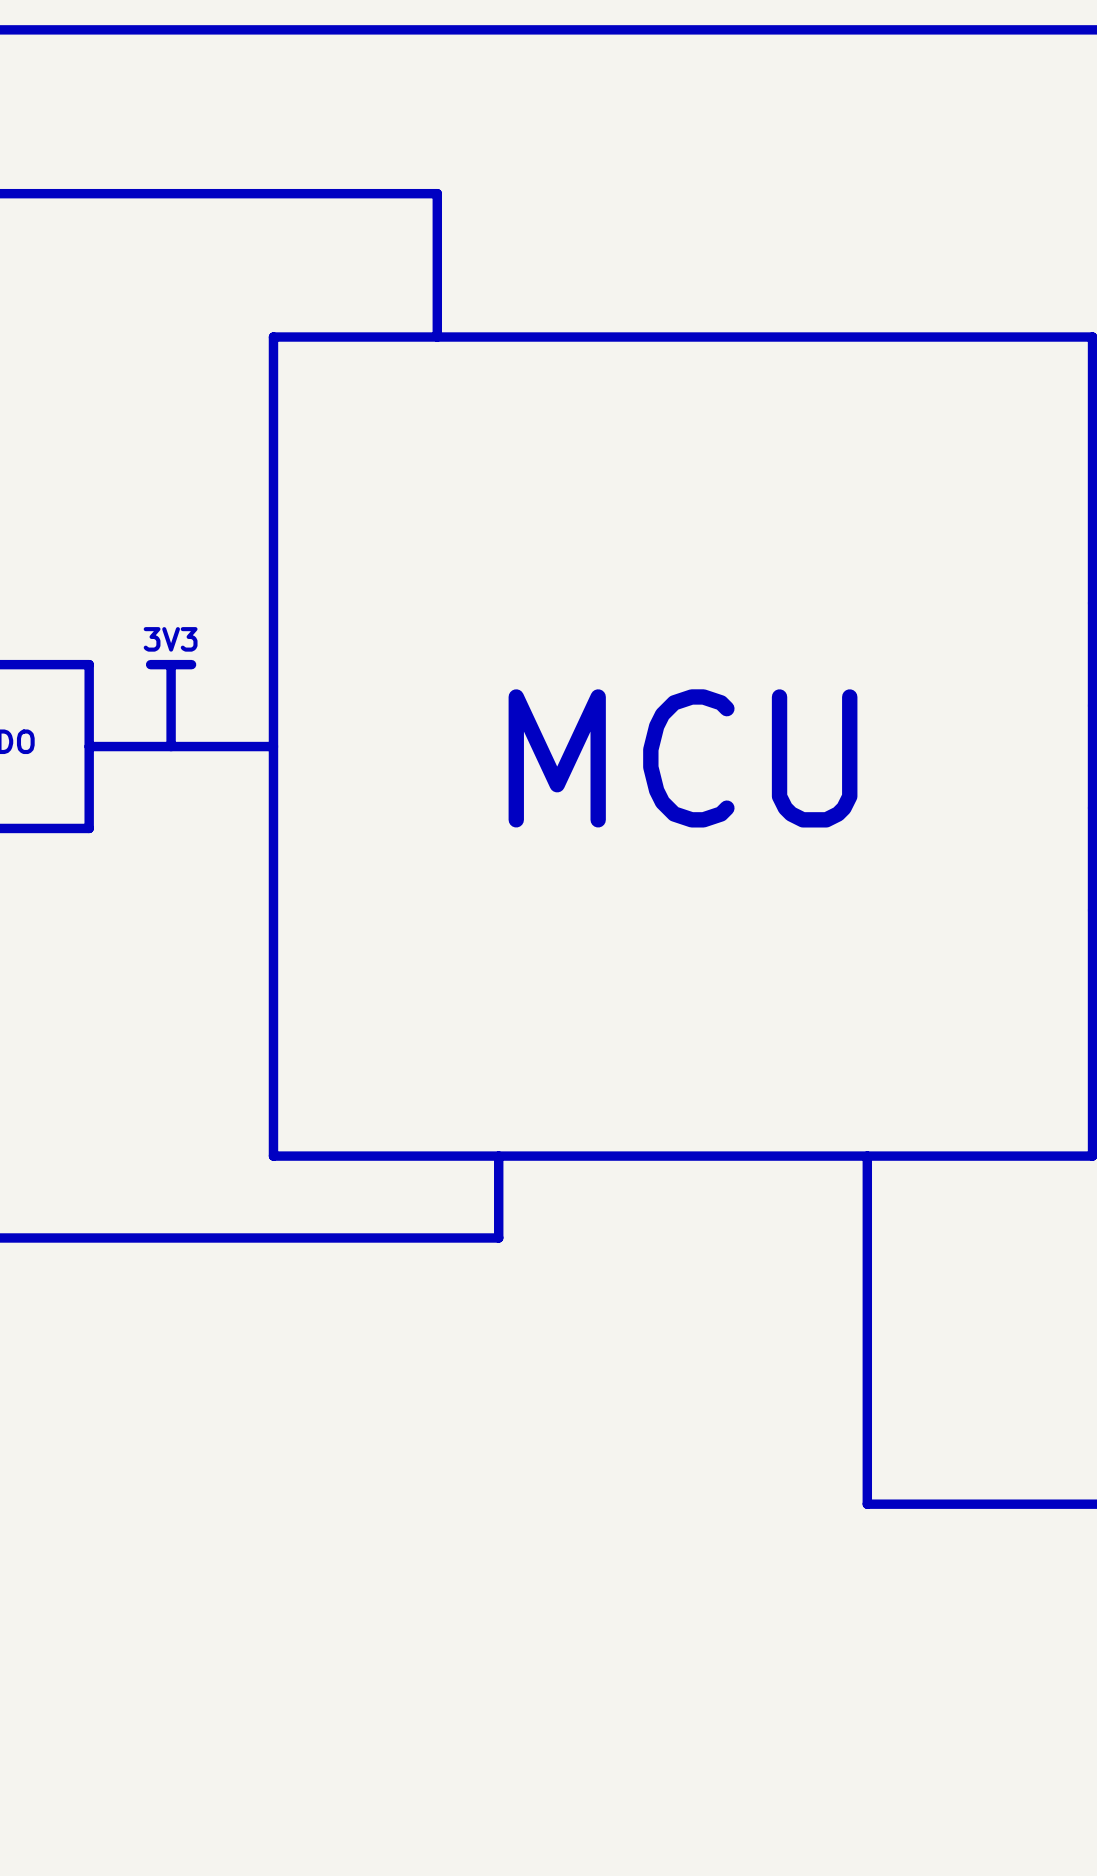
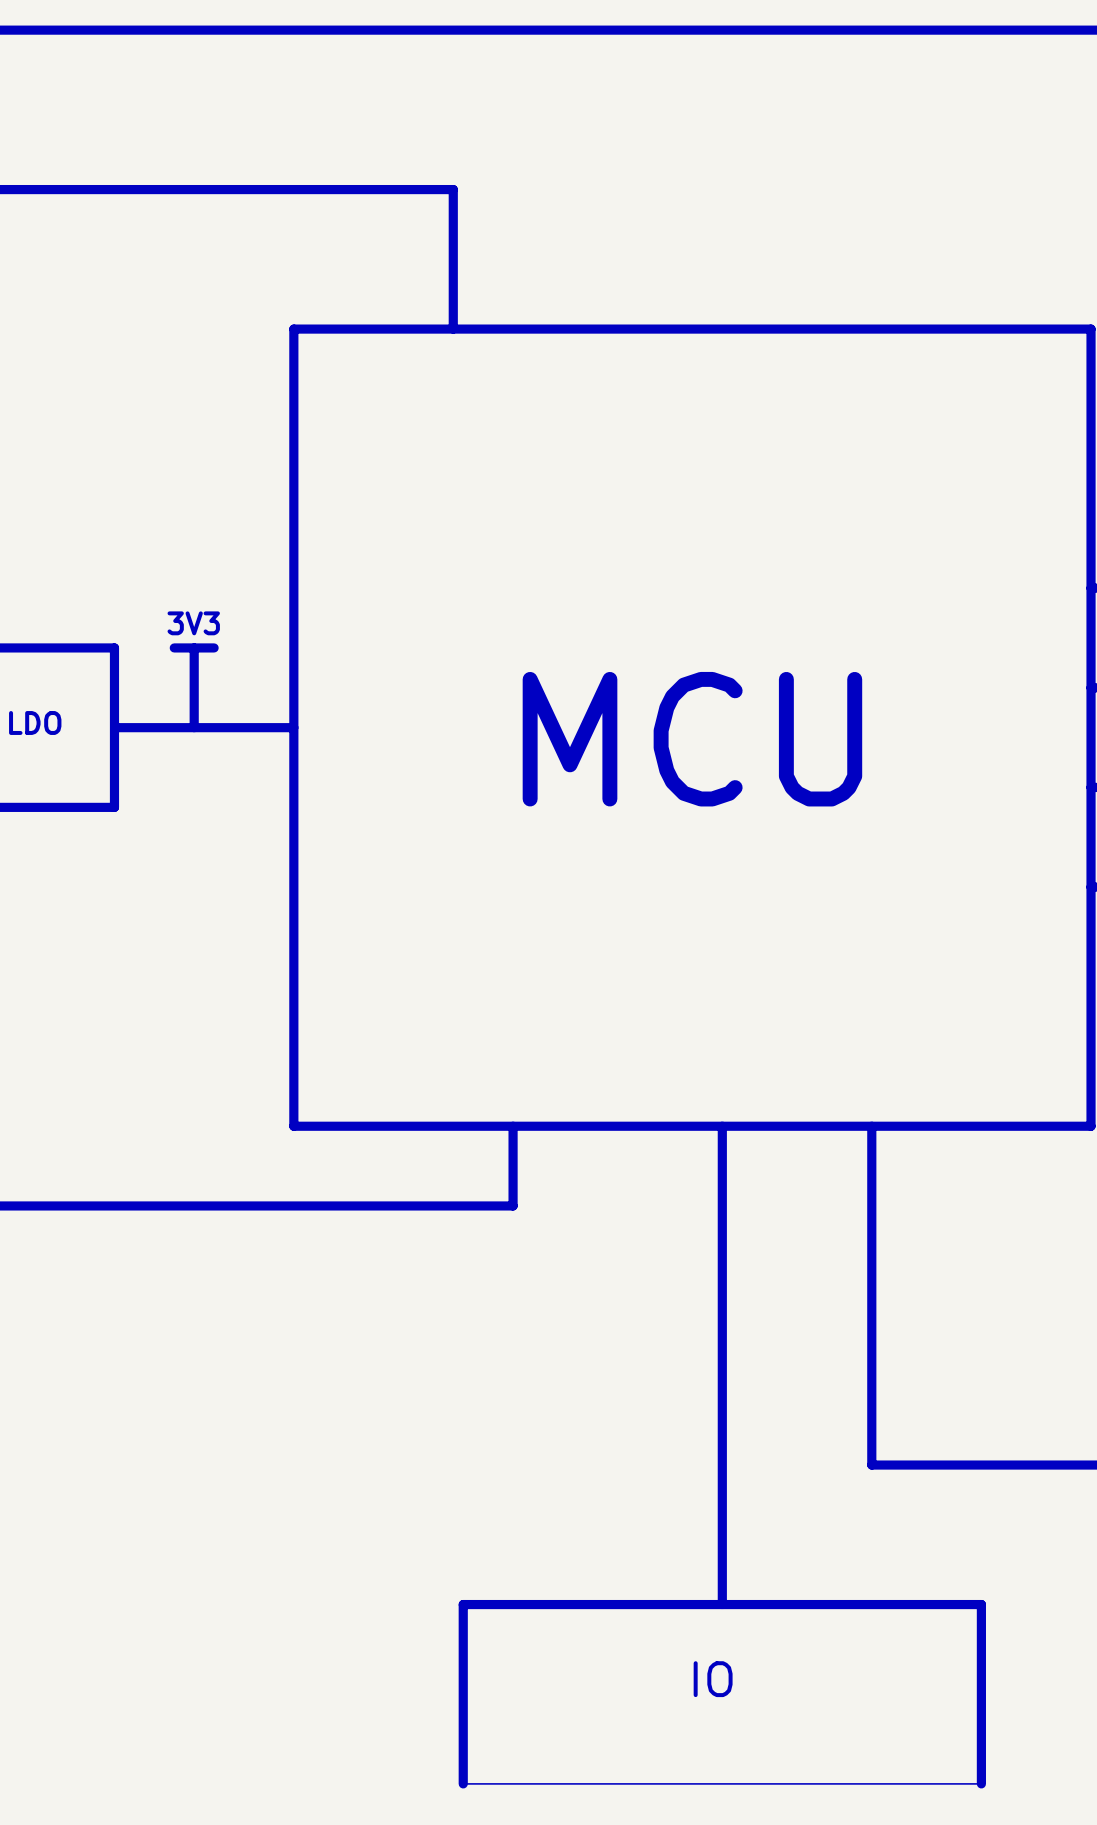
line: none -> (722, 1126) (722, 1604)
line: none -> (463, 1604) (463, 1783)
line: none -> (463, 1604) (981, 1604)
line: none -> (981, 1604) (981, 1783)
text: none -> IO (713, 1679)
line: none -> (463, 1783) (981, 1783)

